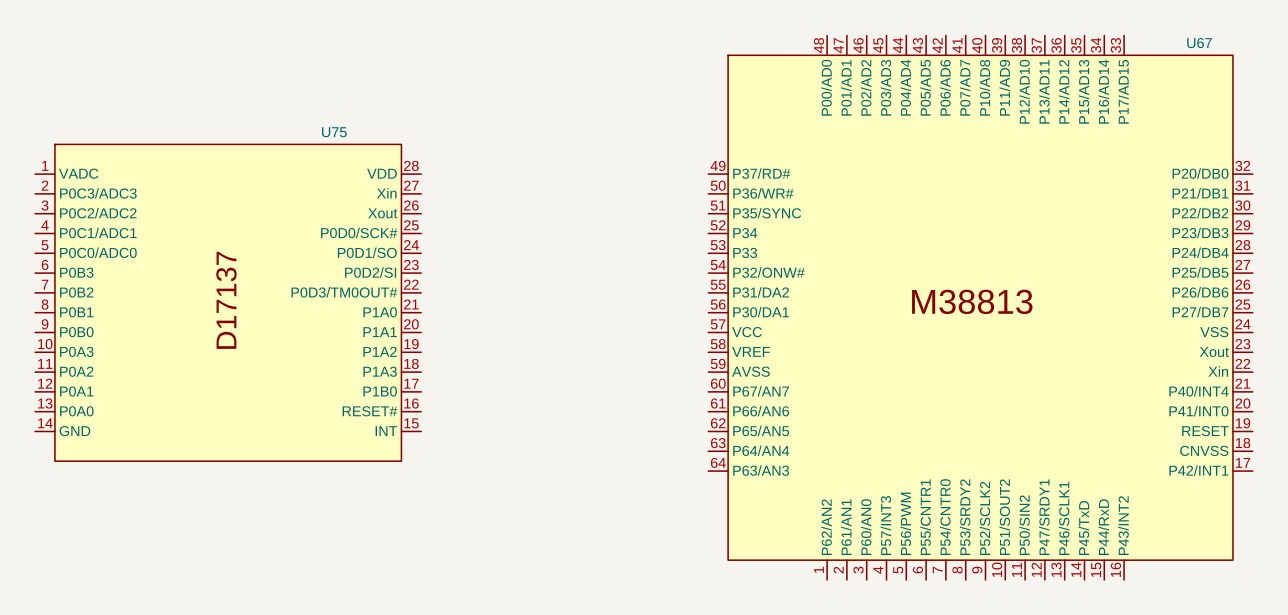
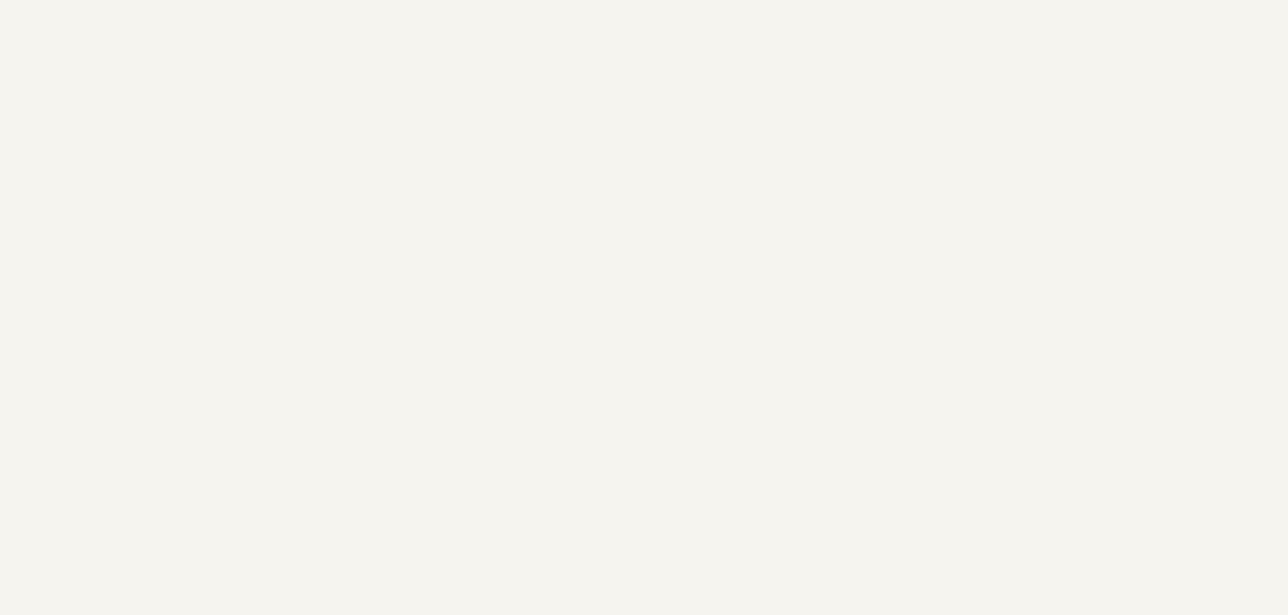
U75: (228, 302) -> none
U67: (980, 307) -> none

